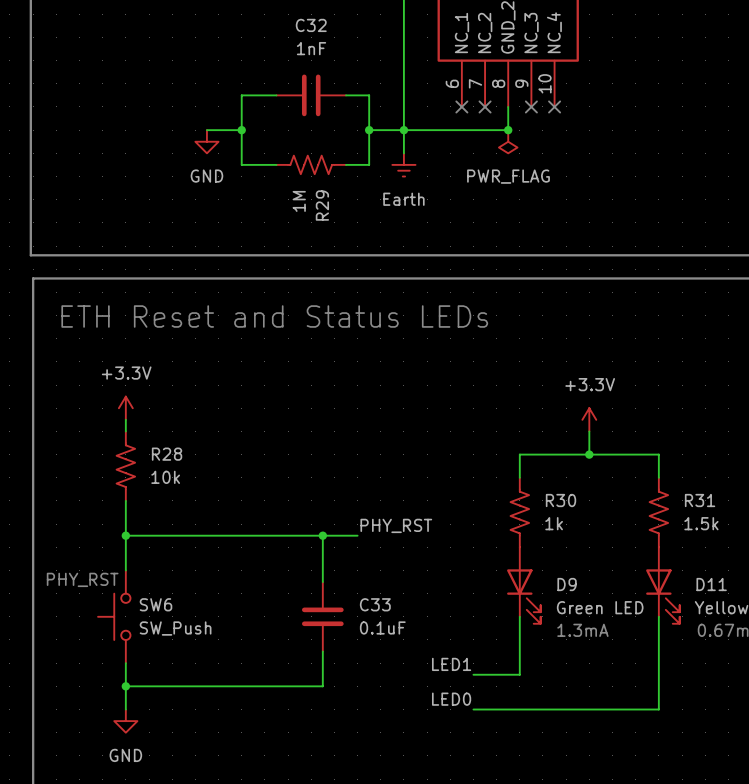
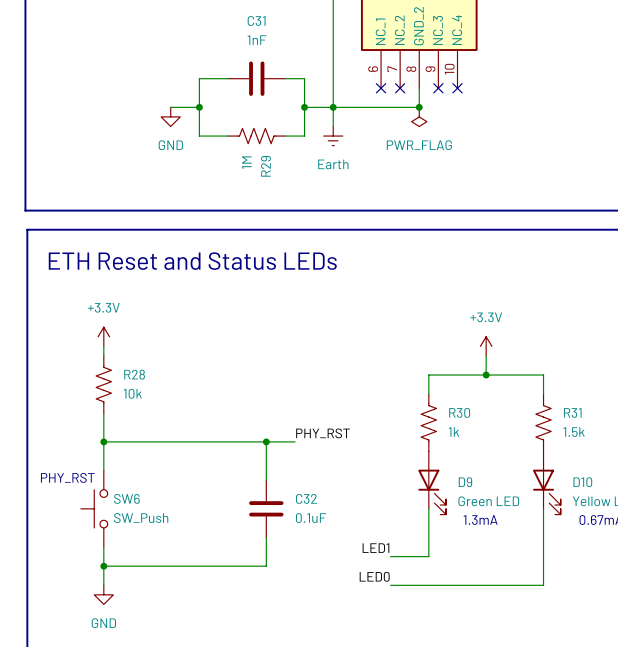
C32 name: C32 (311, 25) -> C31 (256, 20)
D11 name: D11 (711, 584) -> D10 (582, 482)
C33 name: C33 (375, 604) -> C32 (306, 498)

